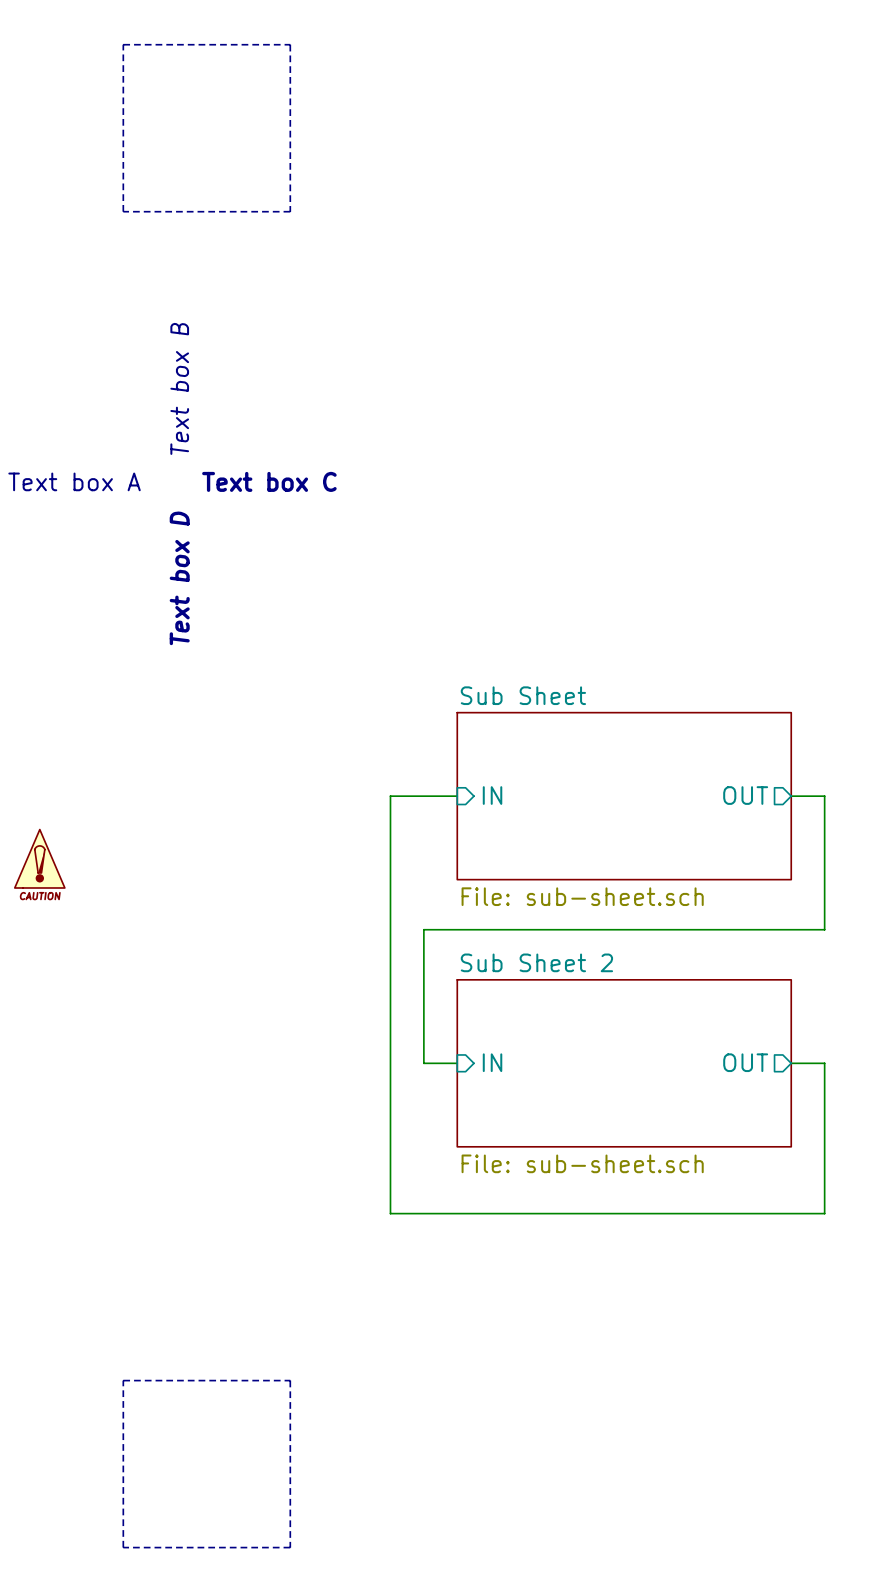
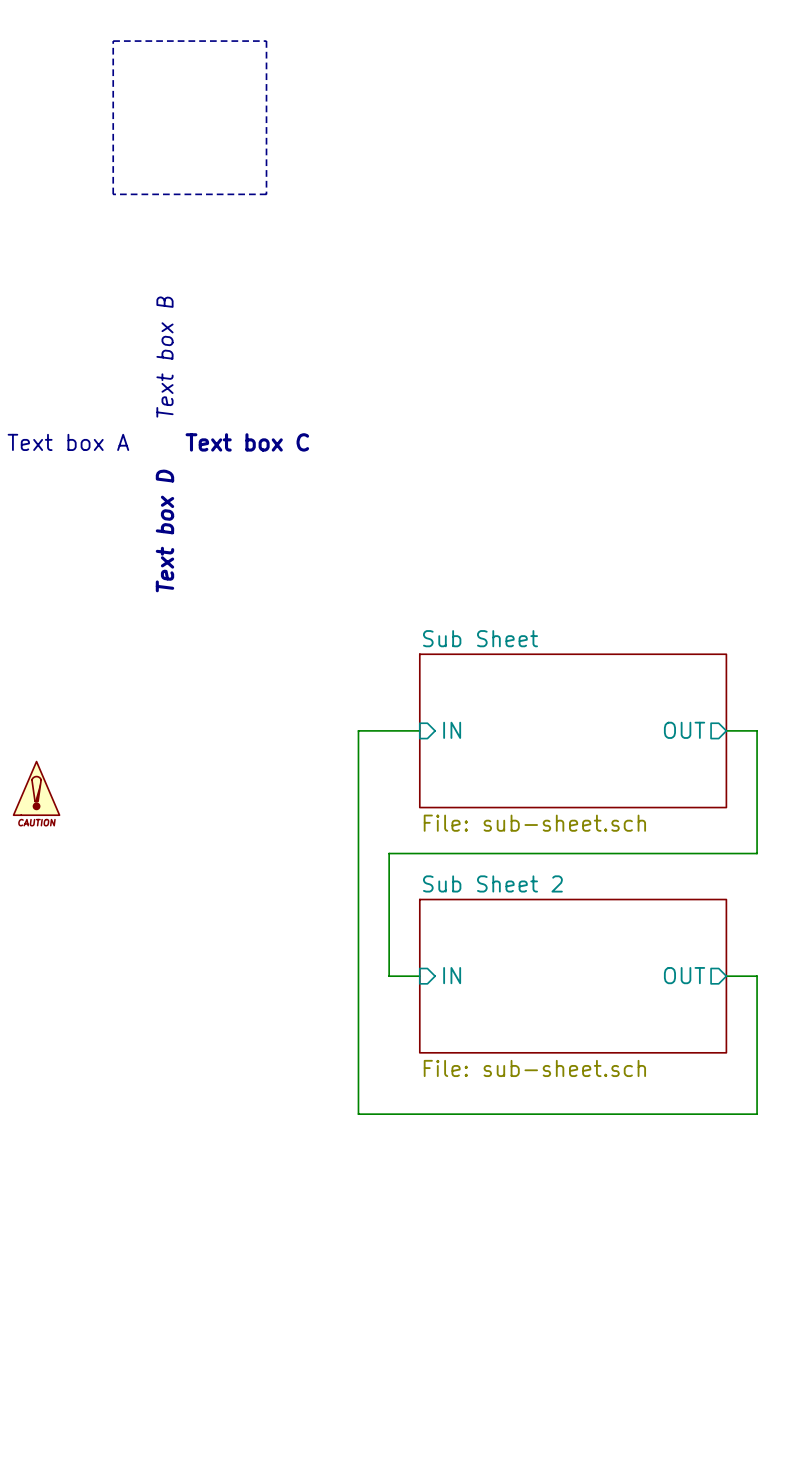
line: (123, 1380) (290, 1380) (290, 1547) (123, 1547) (123, 1380) -> none

